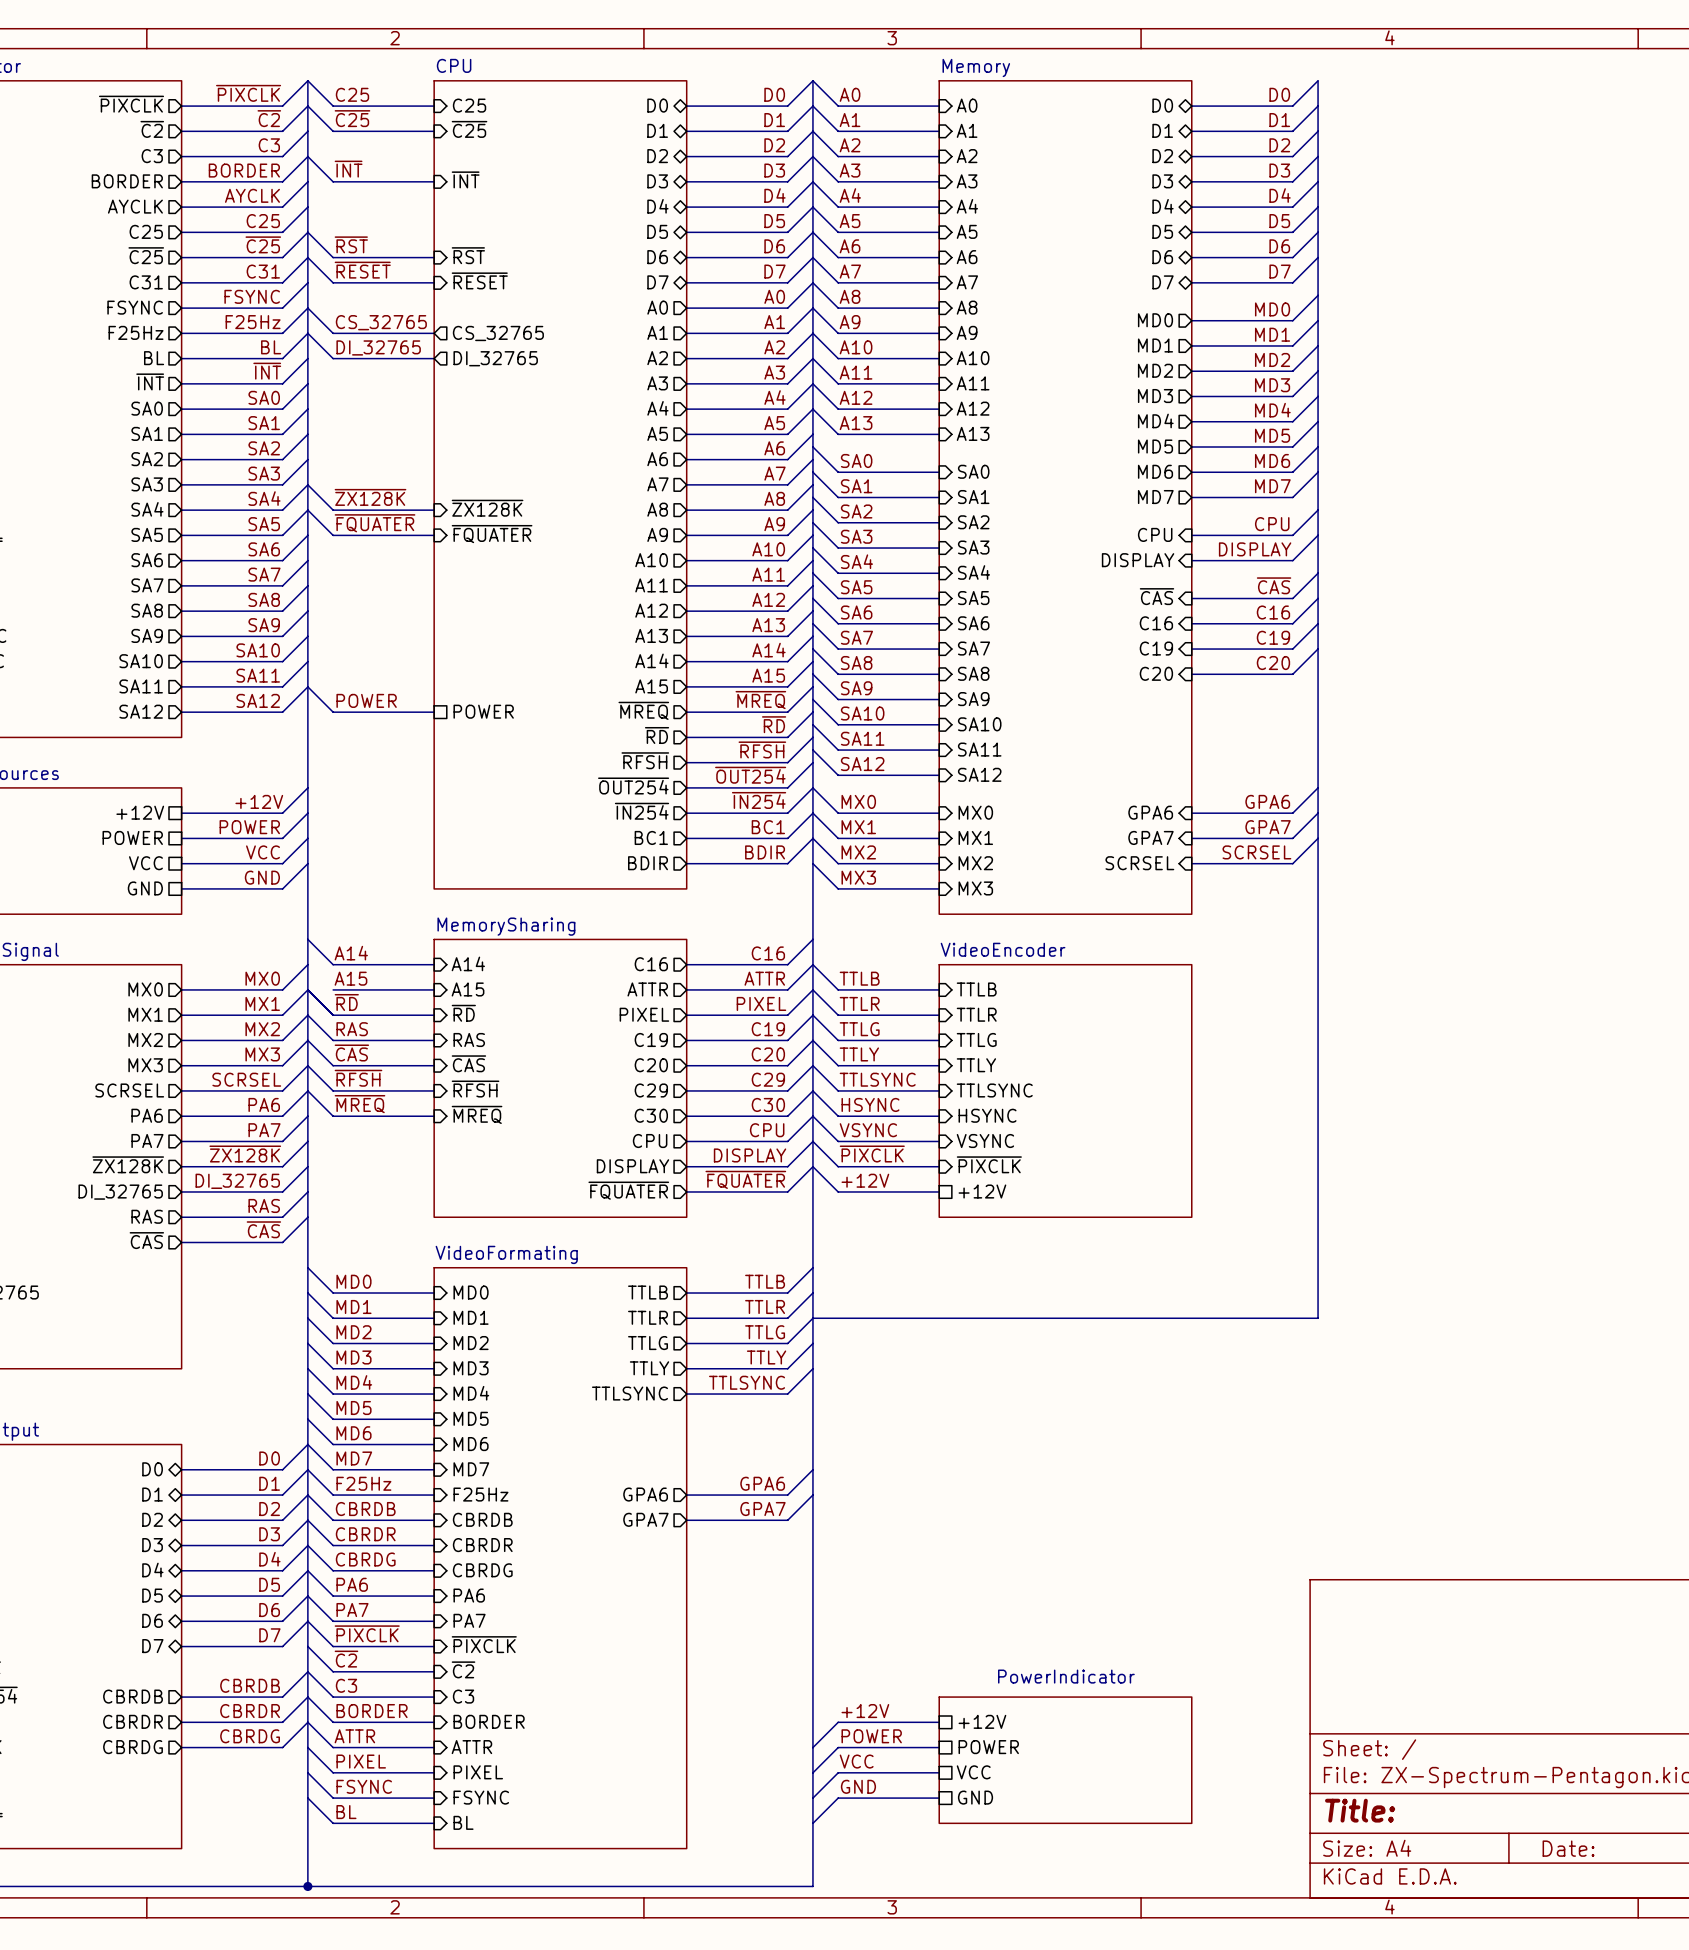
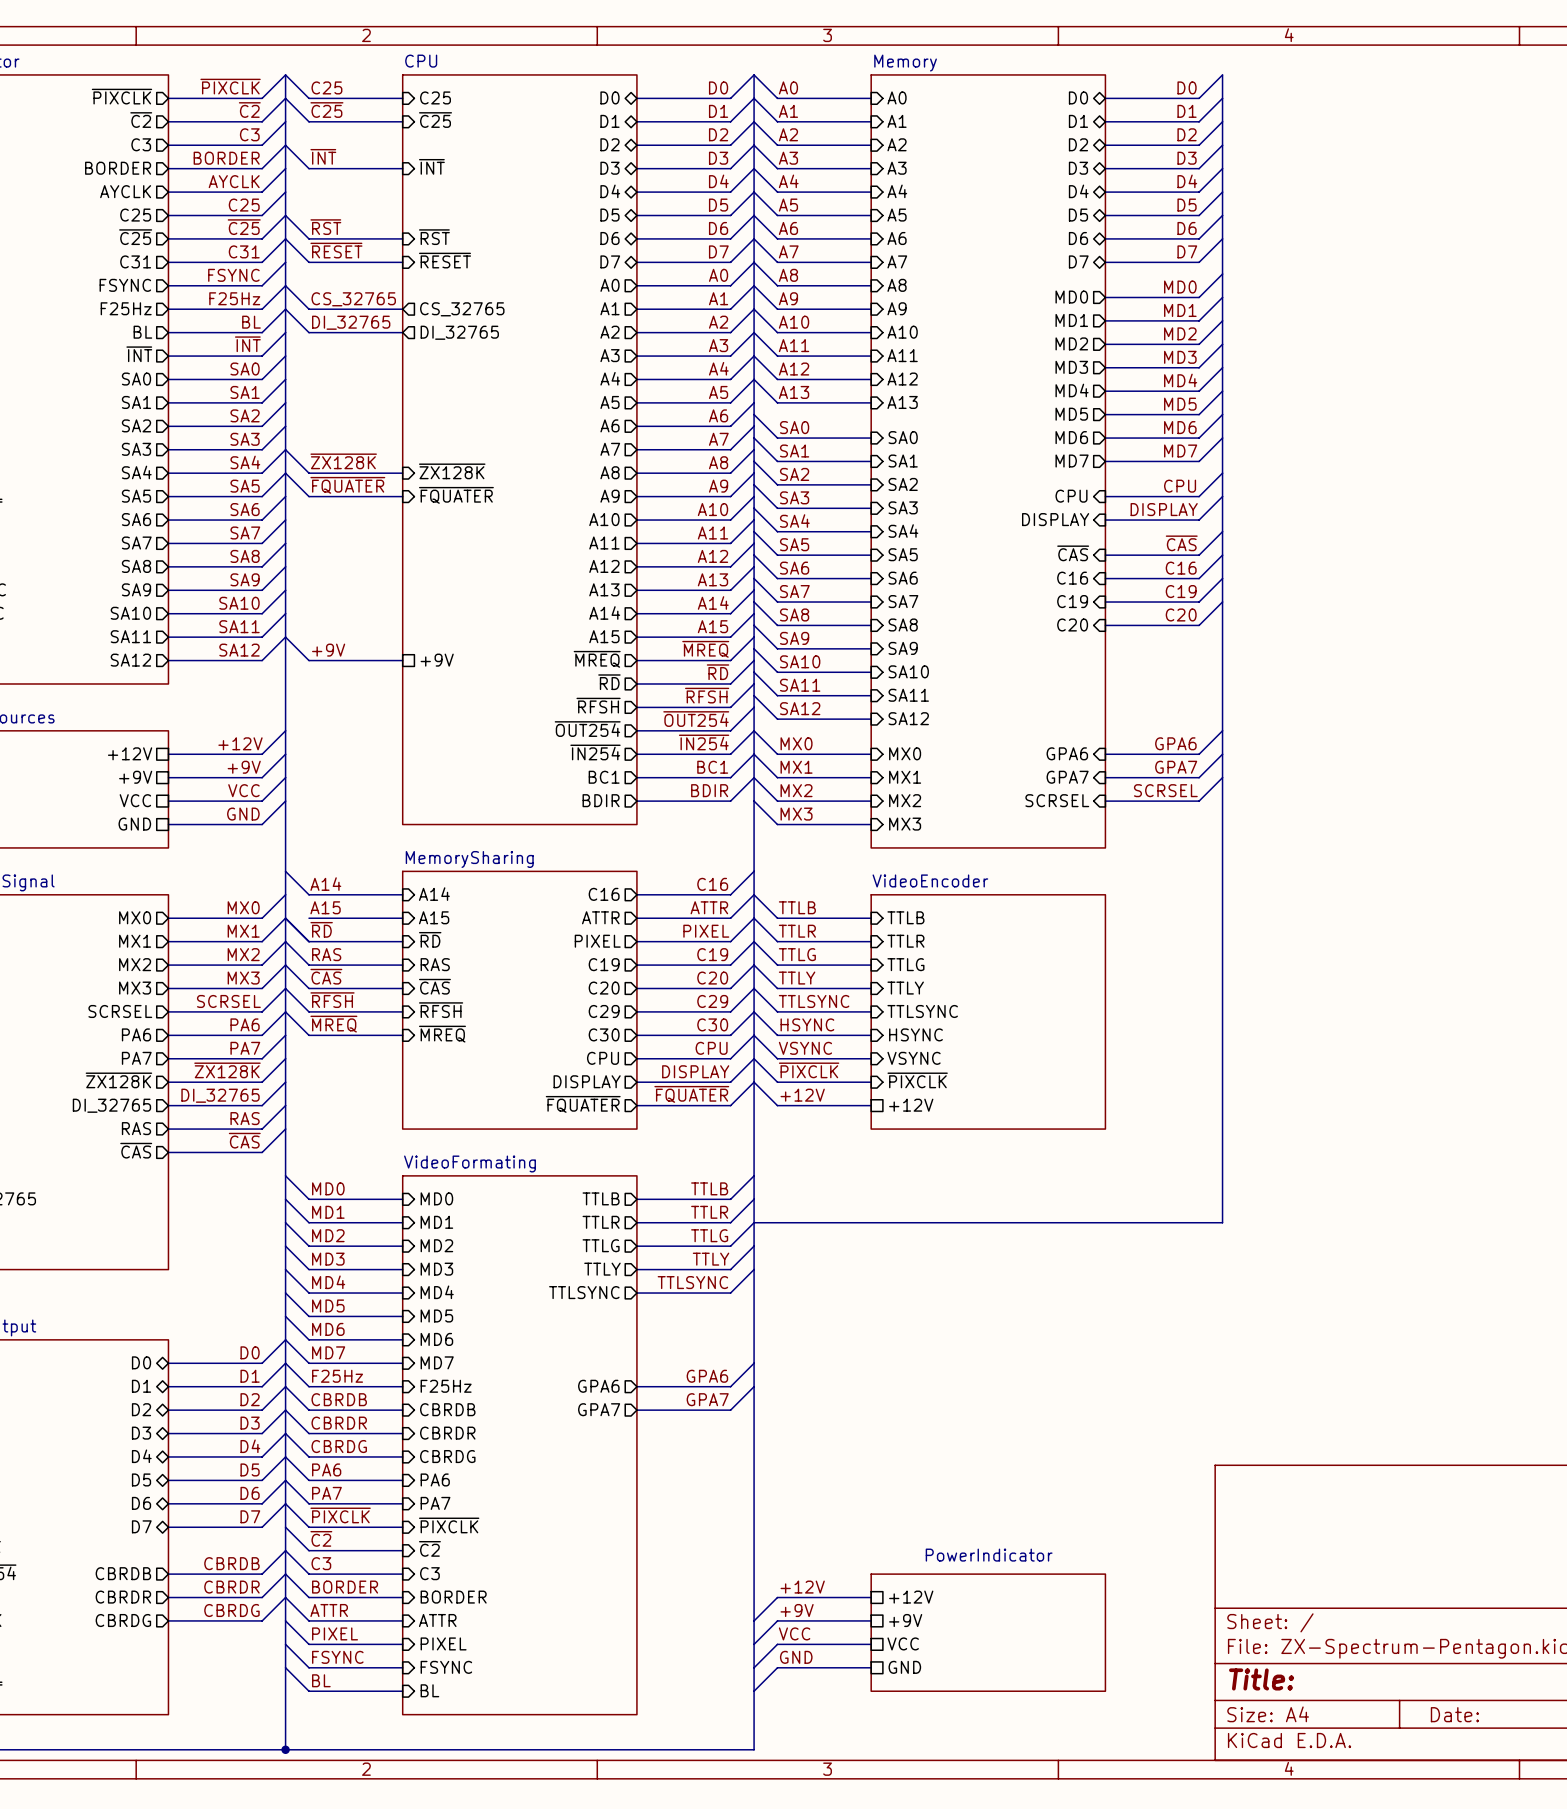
label: POWER (366, 700) -> +9V (328, 650)
sheet pin: POWER (483, 711) -> +9V (437, 660)
label: POWER (249, 827) -> +9V (244, 767)
sheet pin: POWER (132, 837) -> +9V (135, 777)
label: POWER (871, 1736) -> +9V (797, 1610)
sheet pin: POWER (988, 1747) -> +9V (905, 1620)

